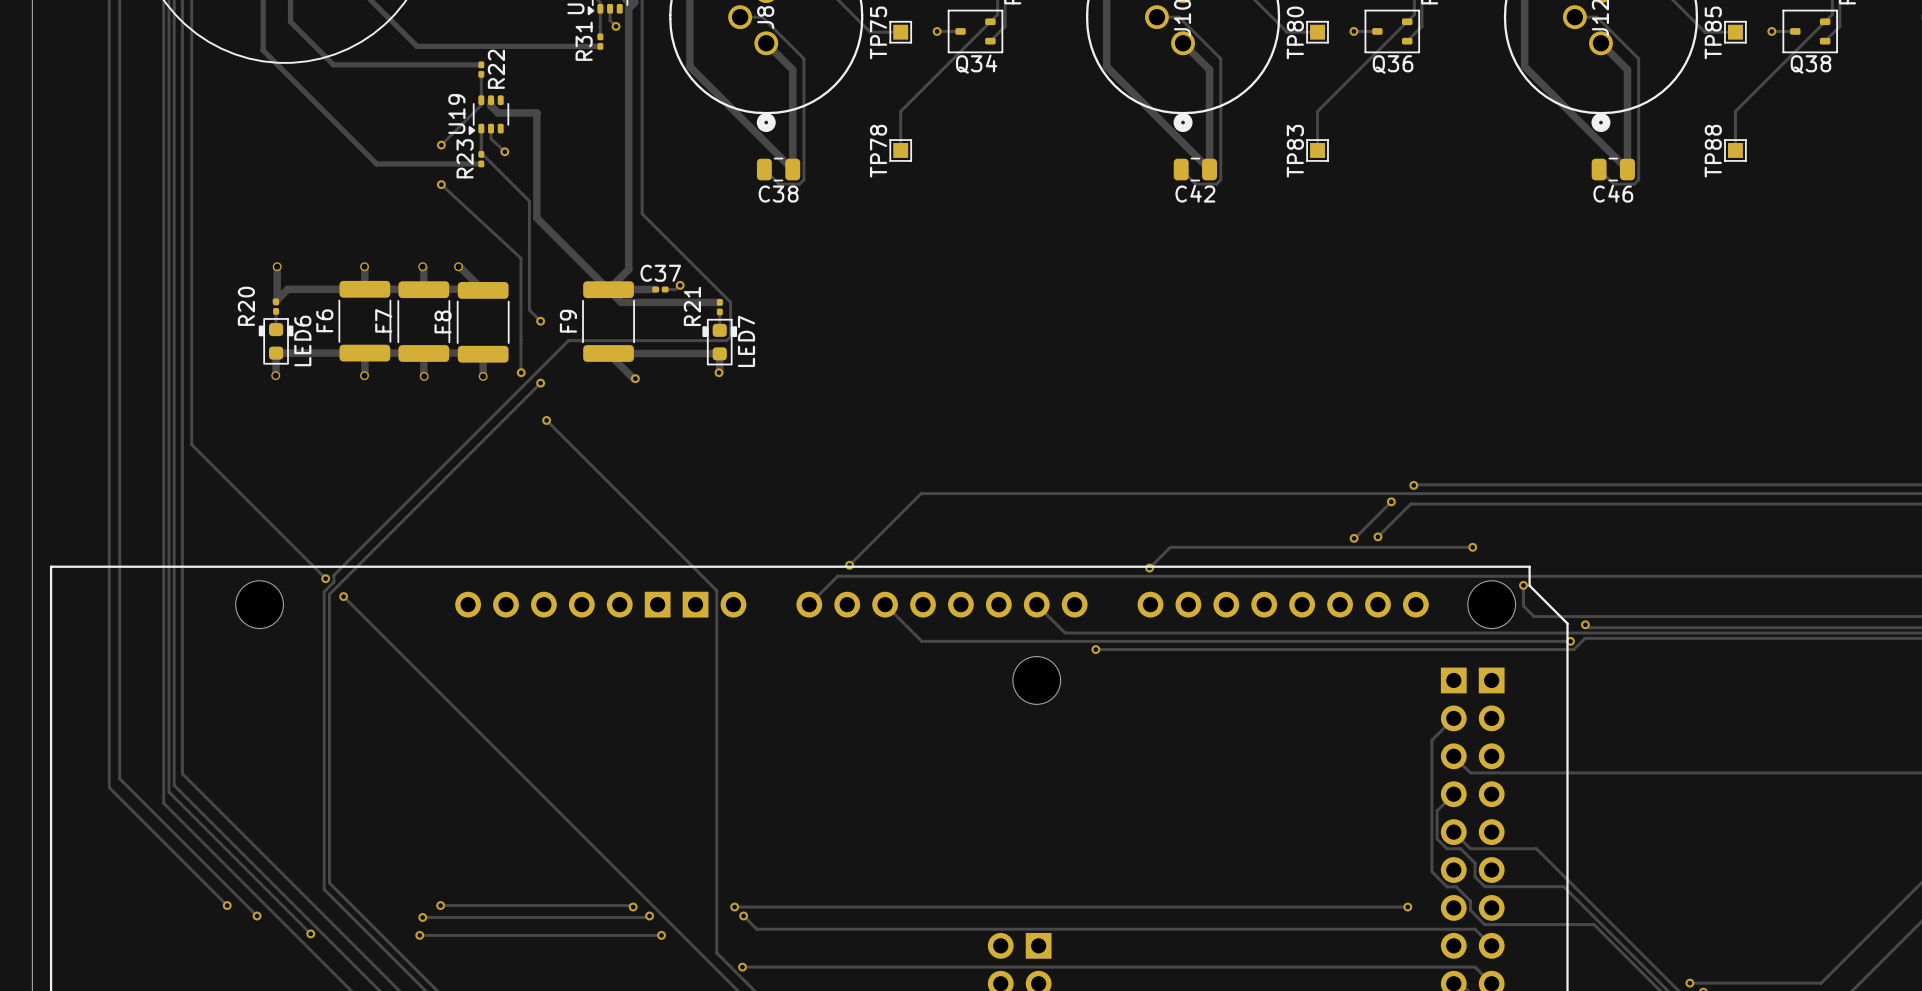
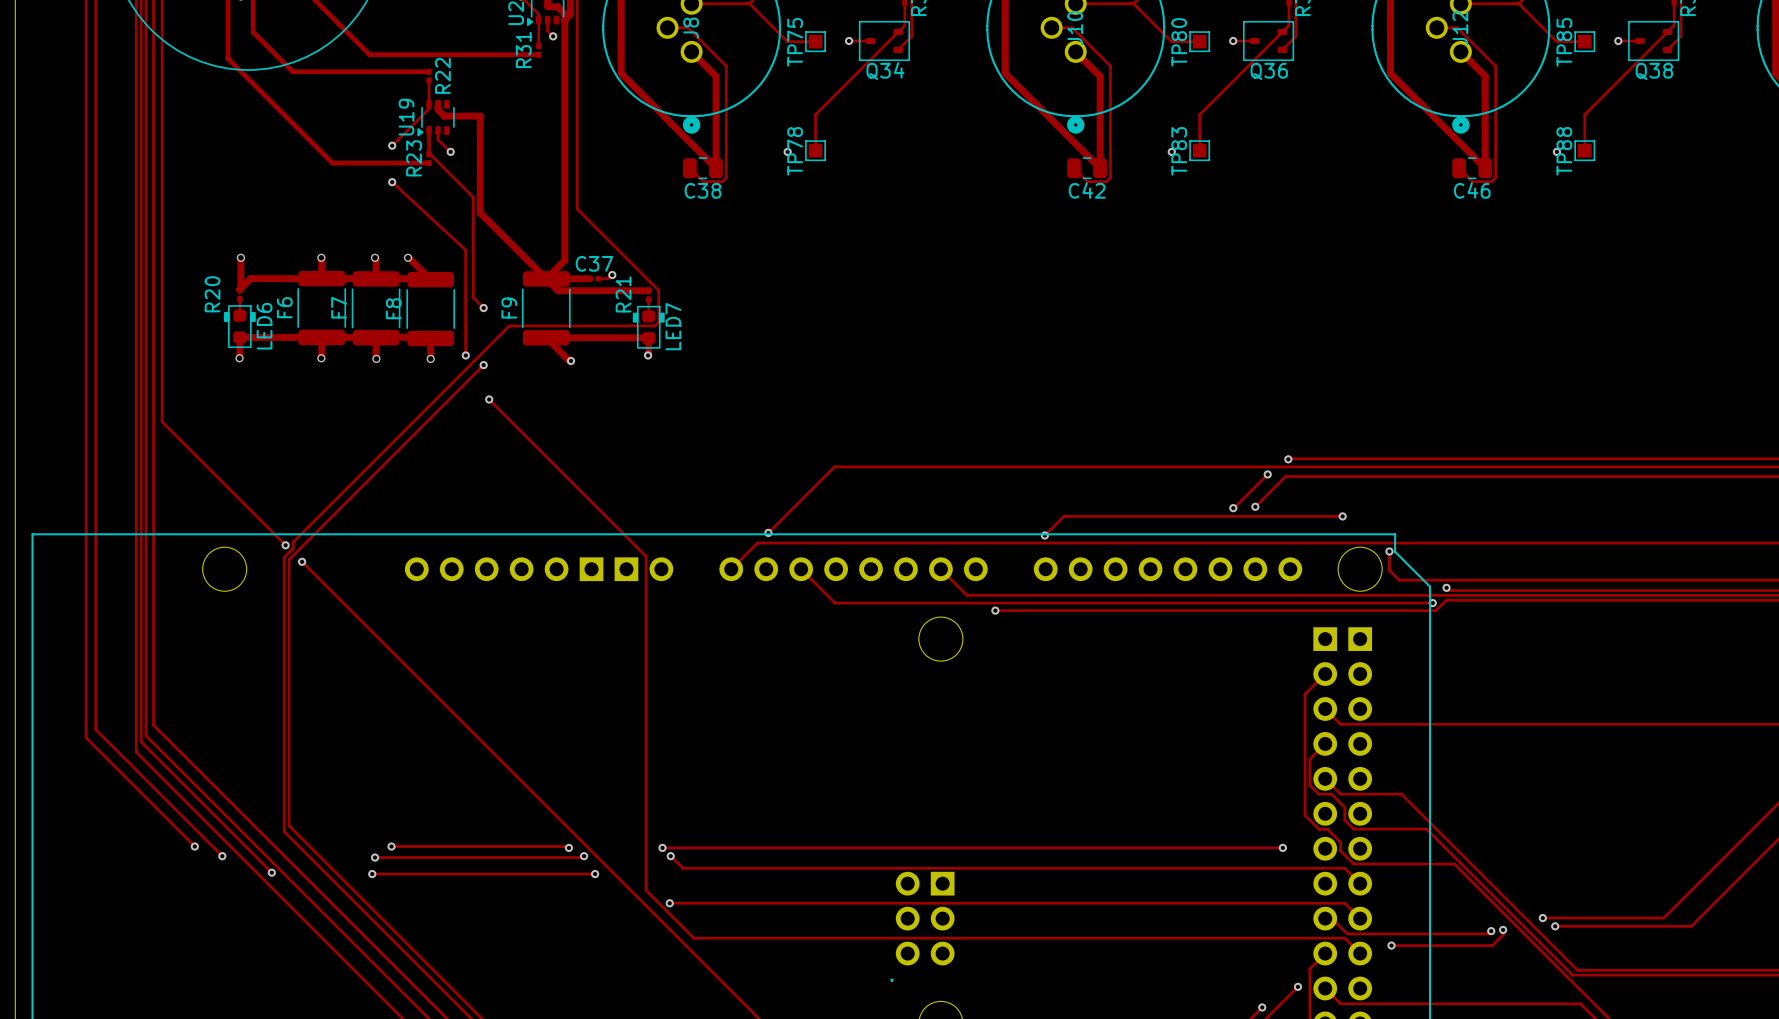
via: none -> (787, 151)
via: none -> (1171, 151)
via: none -> (1556, 151)

